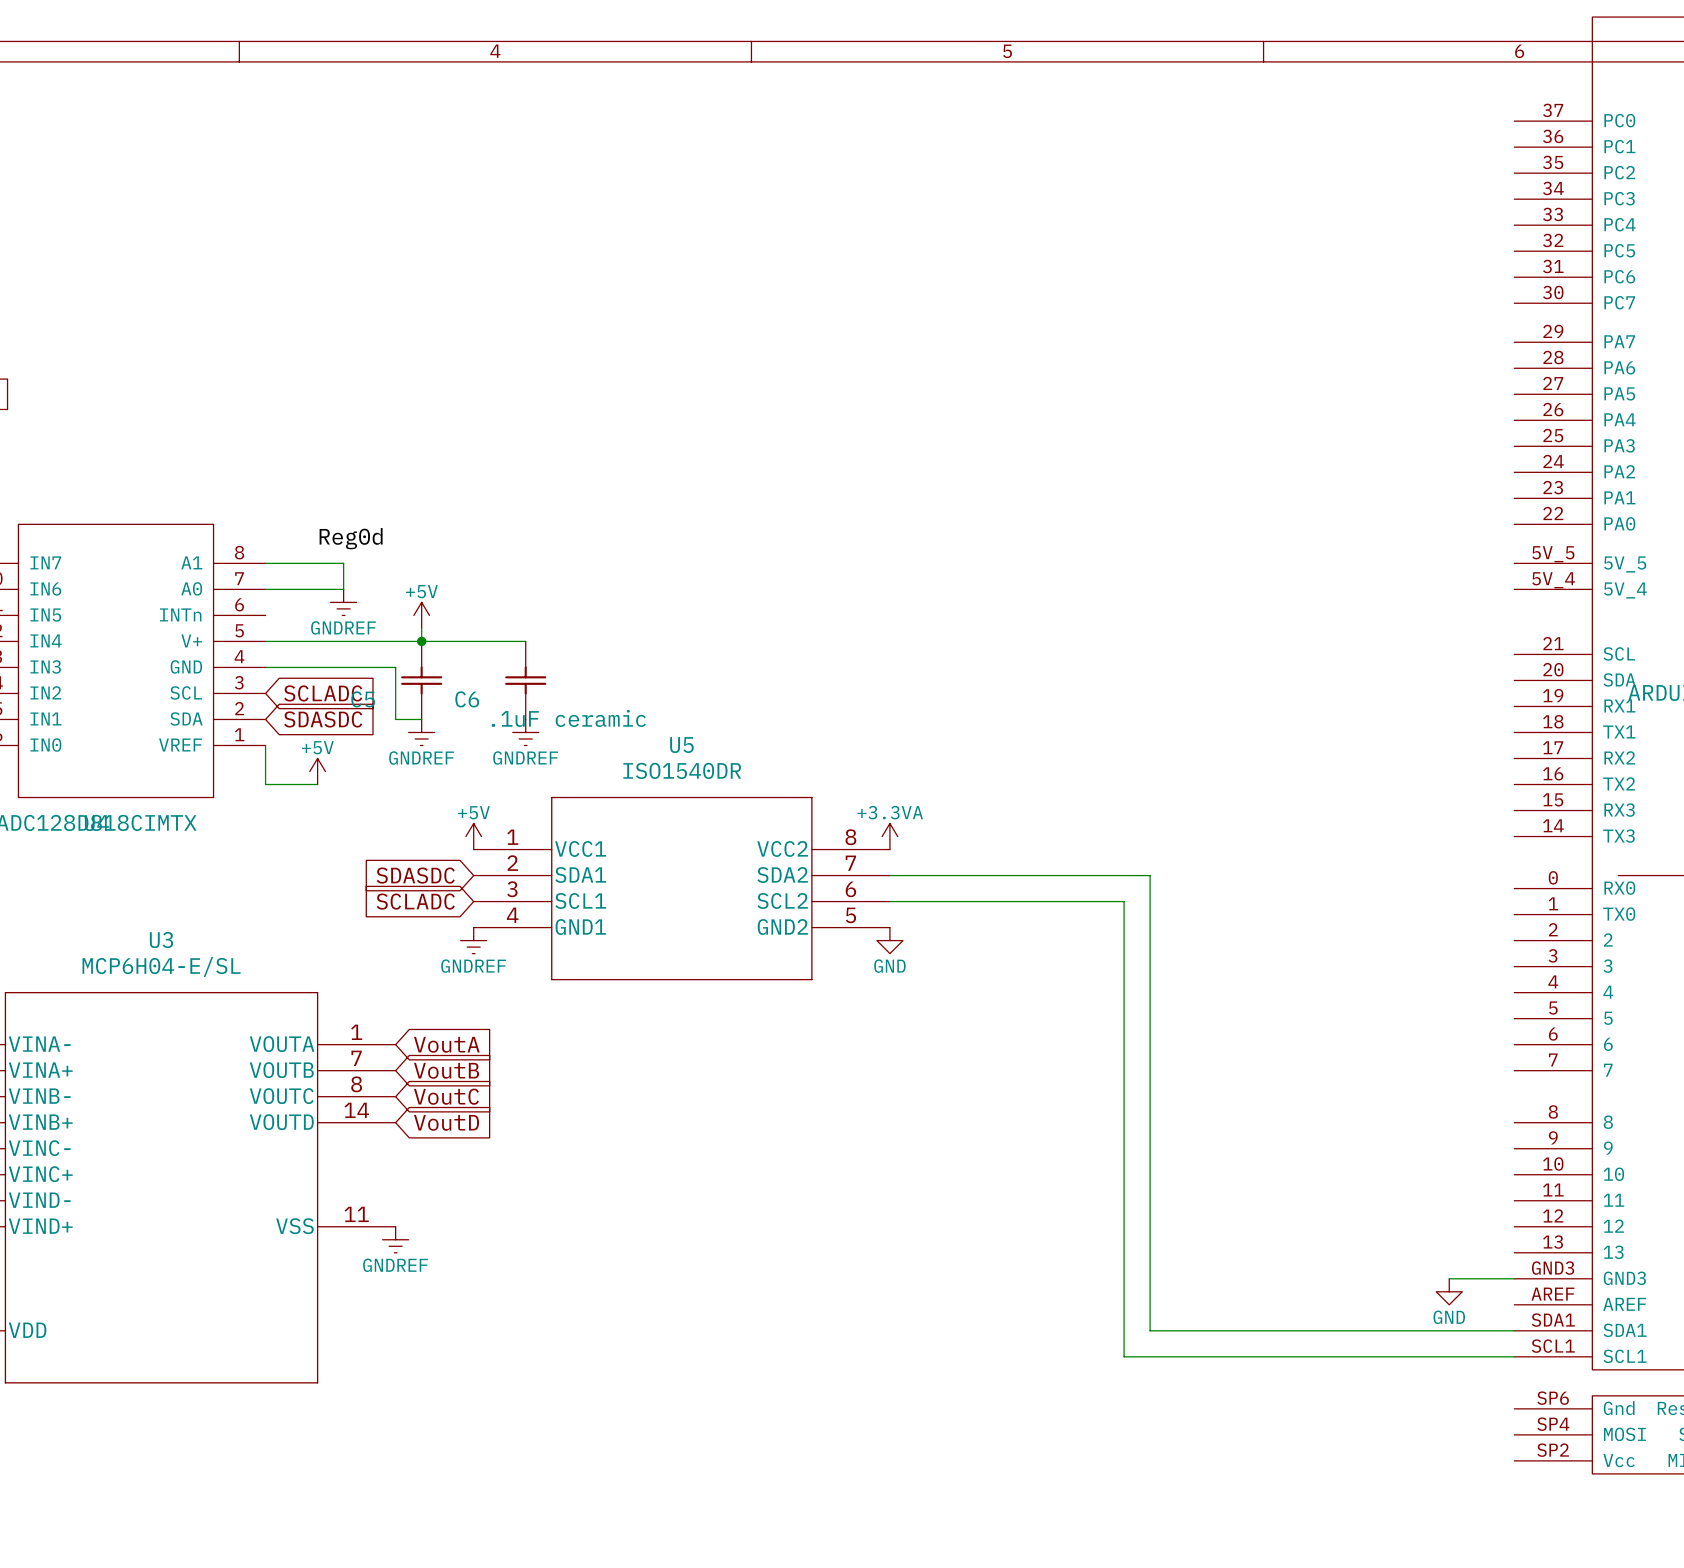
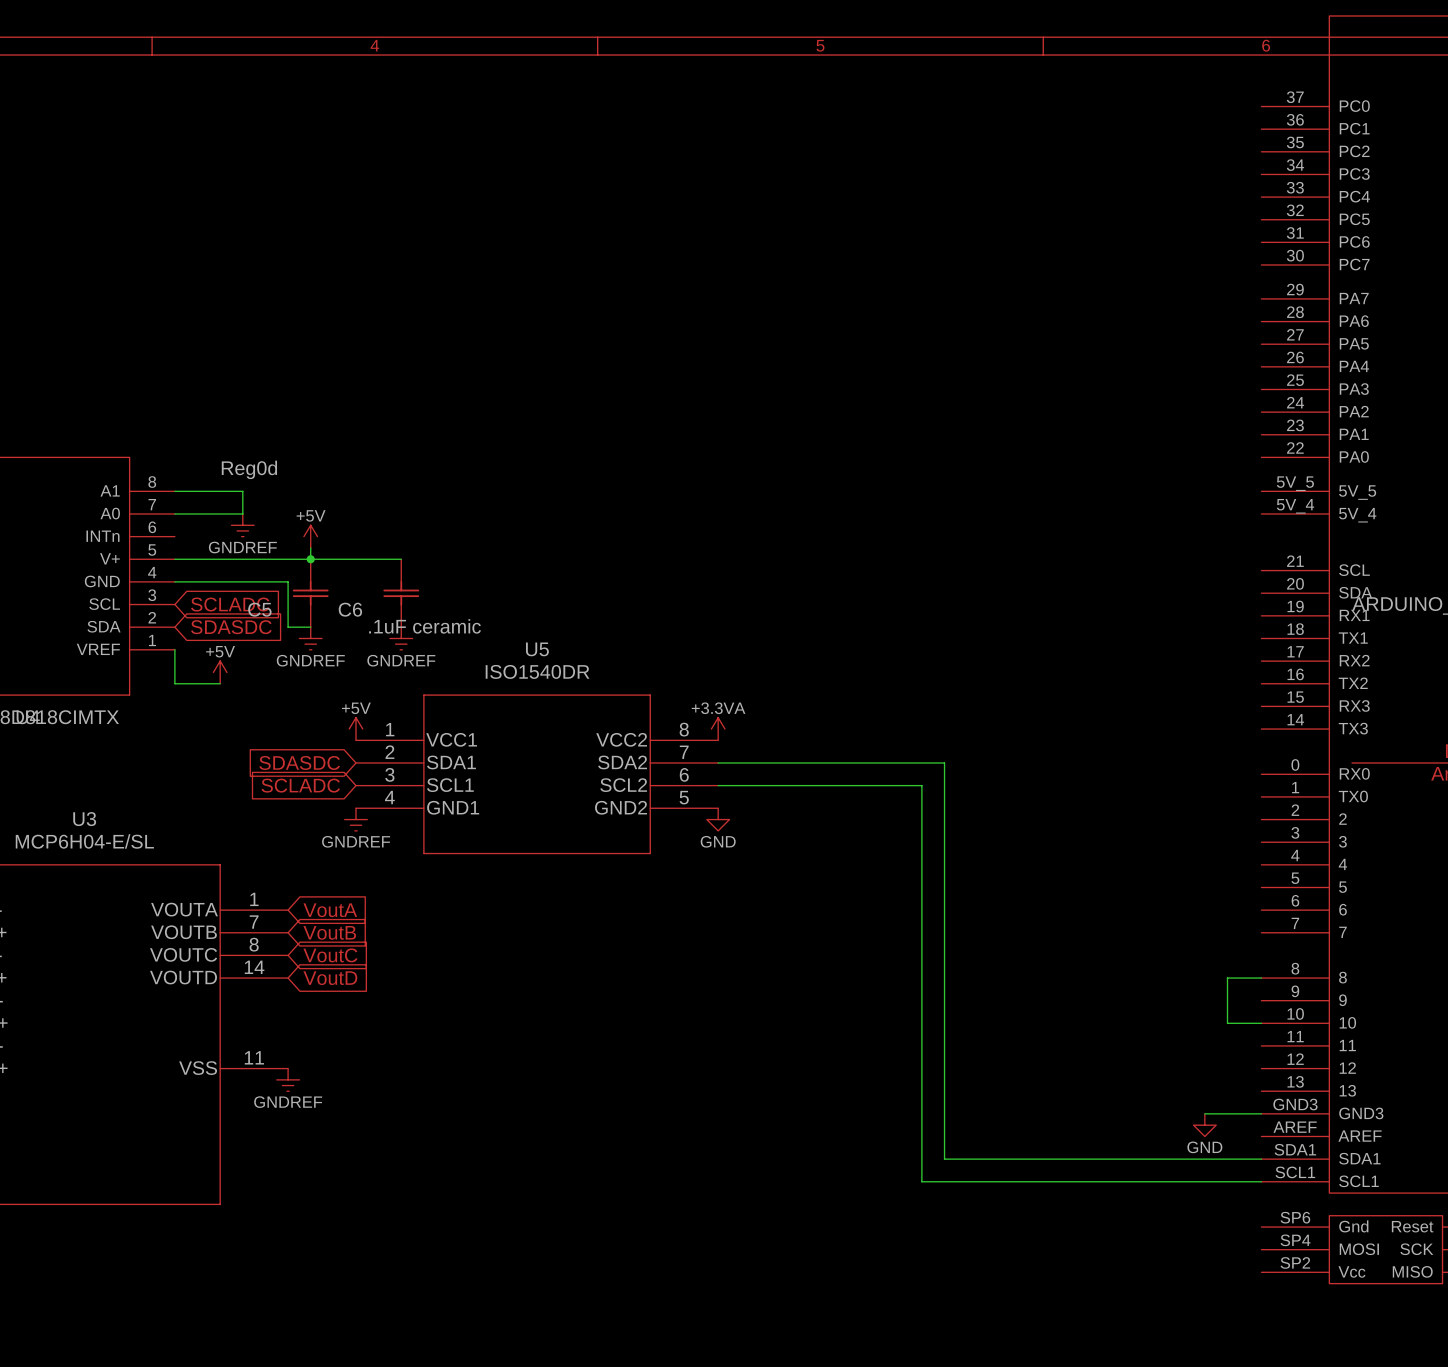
wire: none -> (1261, 978) (1227, 978) (1227, 1023) (1261, 1023)

